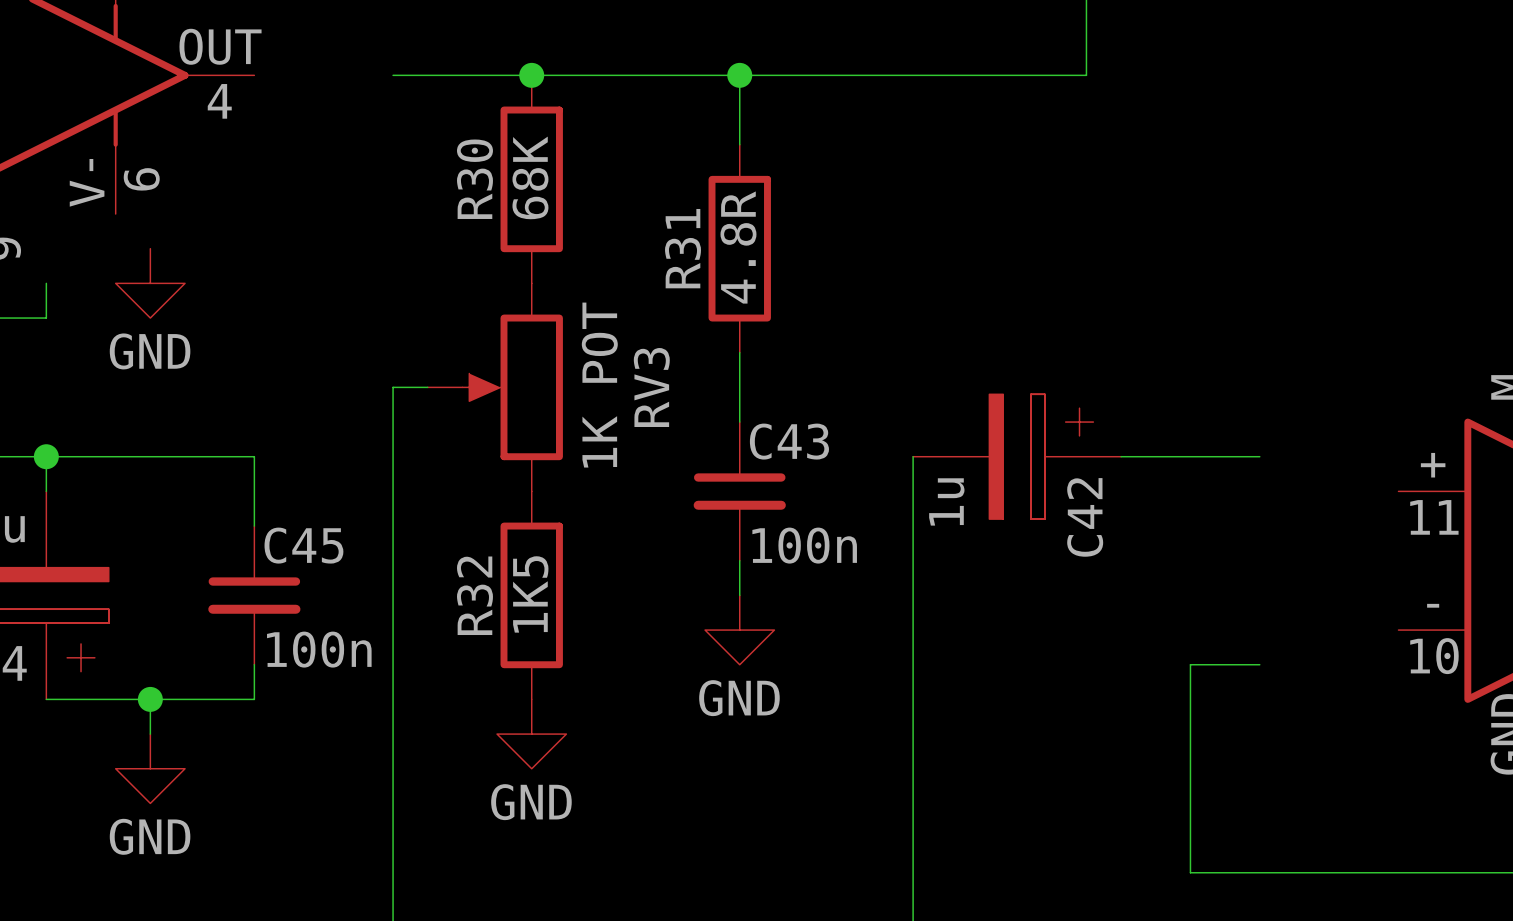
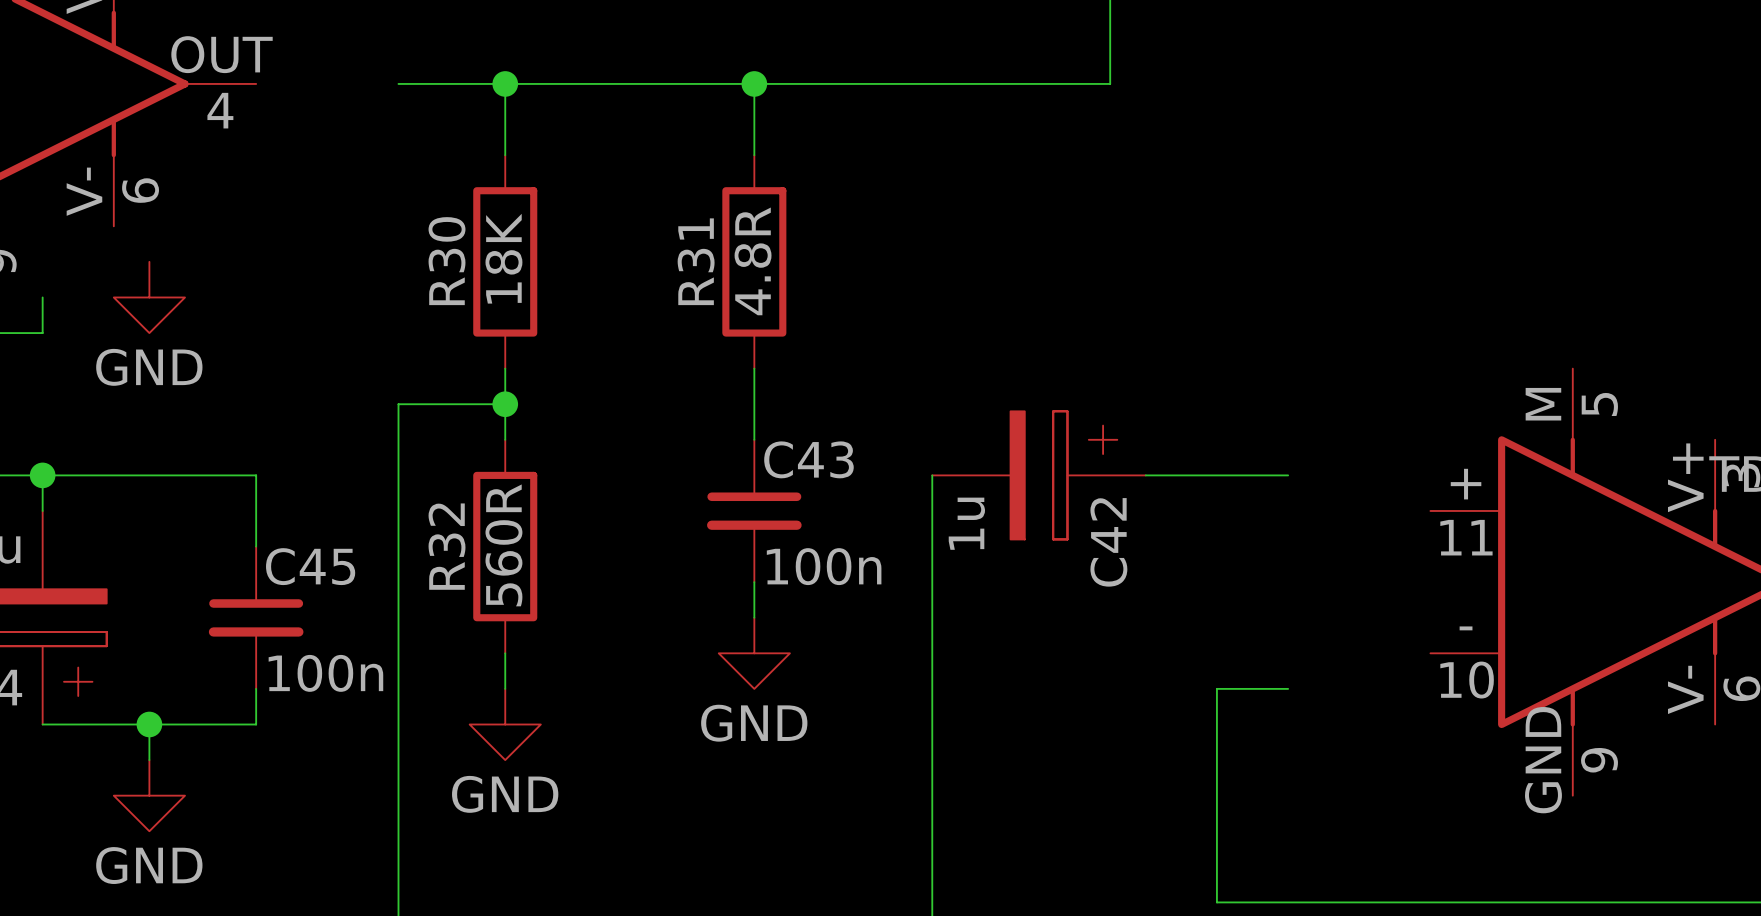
wire: none -> (505, 83) (505, 155)
junction position: (531, 75) -> (505, 83)
R30 value: 68K (530, 177) -> 18K (503, 258)
R30 position: (531, 179) -> (505, 261)
wire: none -> (505, 368) (505, 439)
RV3: 1K POT (495, 387) -> none
junction: none -> (505, 404)
R32 value: 1K5 (530, 594) -> 560R (503, 545)
R32 position: (531, 595) -> (505, 546)
wire: none -> (505, 653) (505, 688)
power symbol position: GND (531, 734) -> GND (505, 724)

